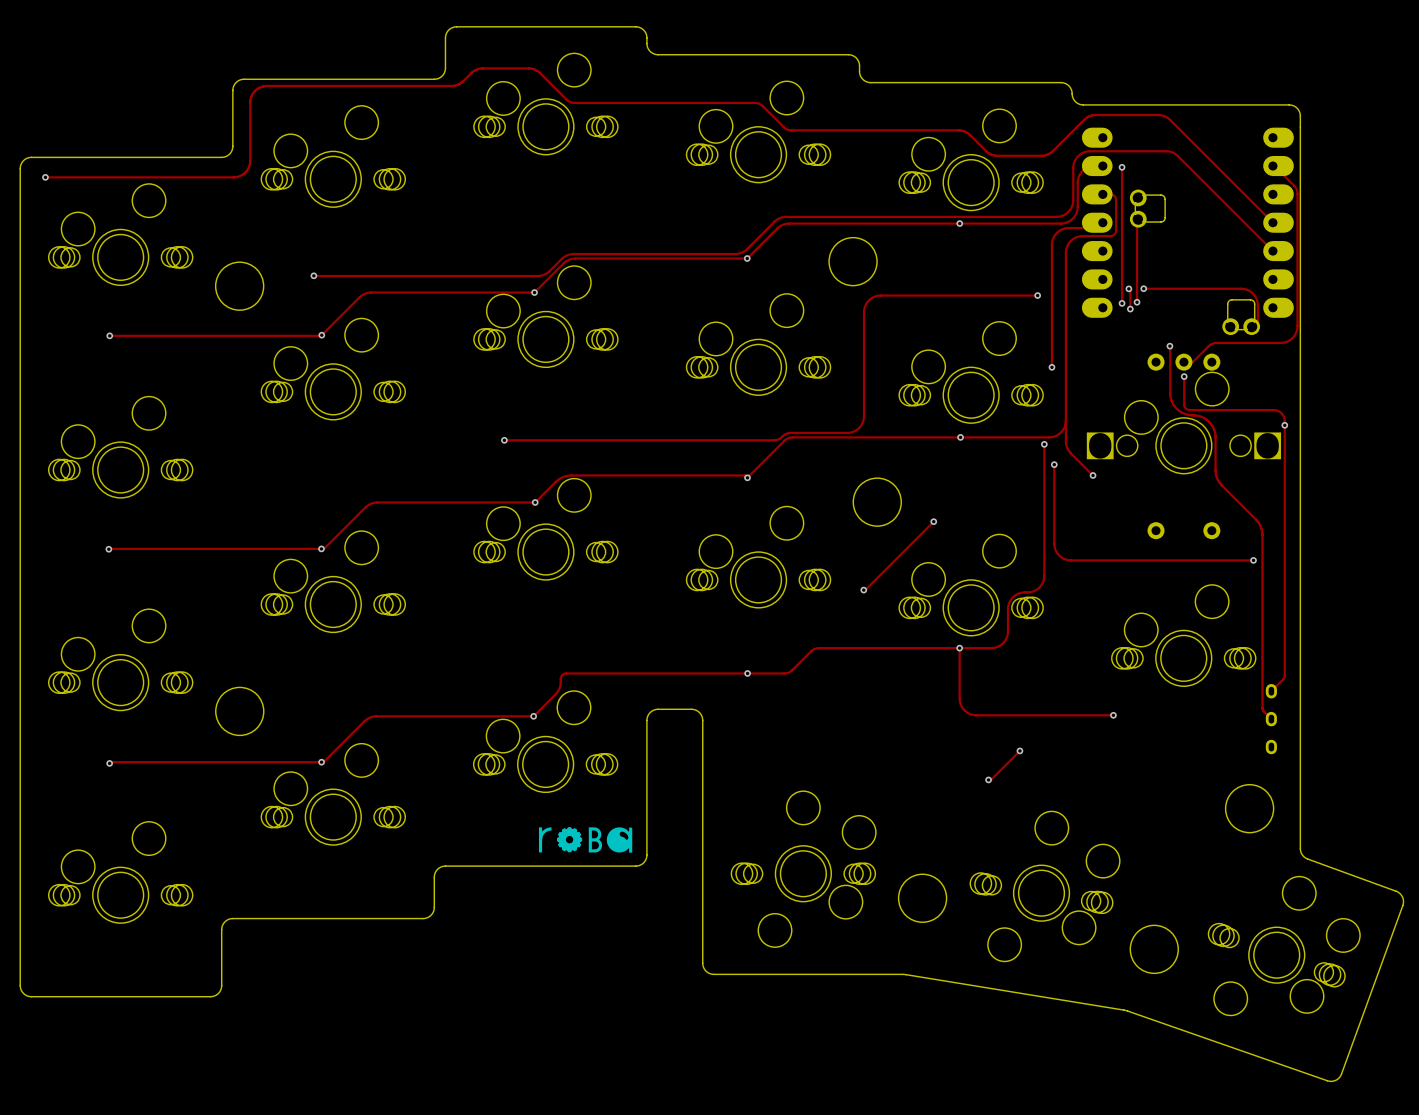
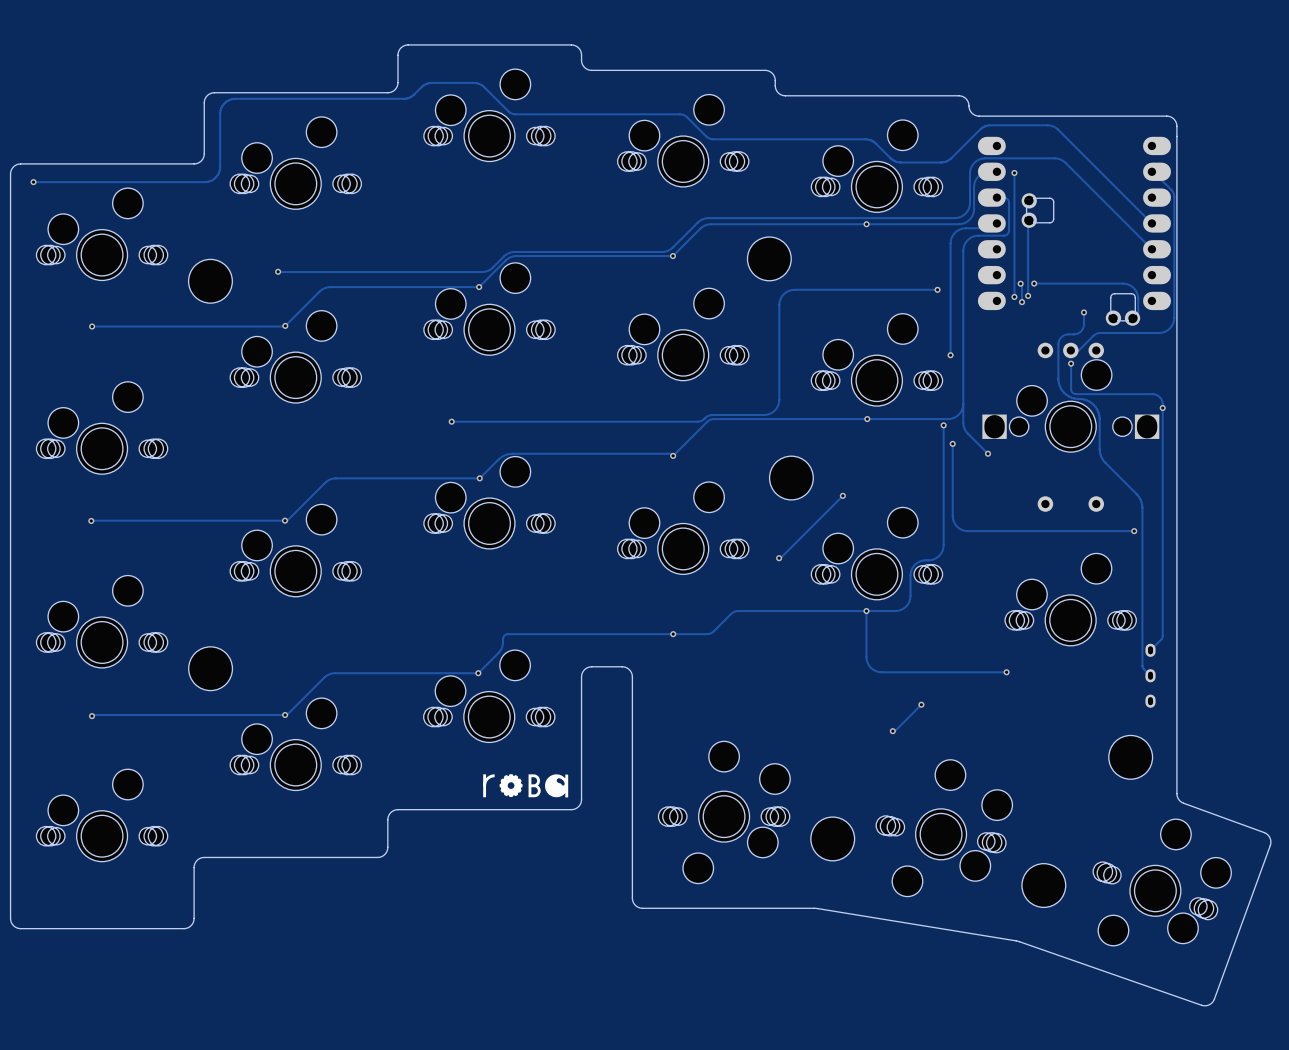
track: (1169, 346) (1170, 355) -> (1084, 312) (1083, 325) (1081, 330) (1077, 333) (1063, 335) (1058, 344)
via position: (1169, 346) -> (1084, 312)

